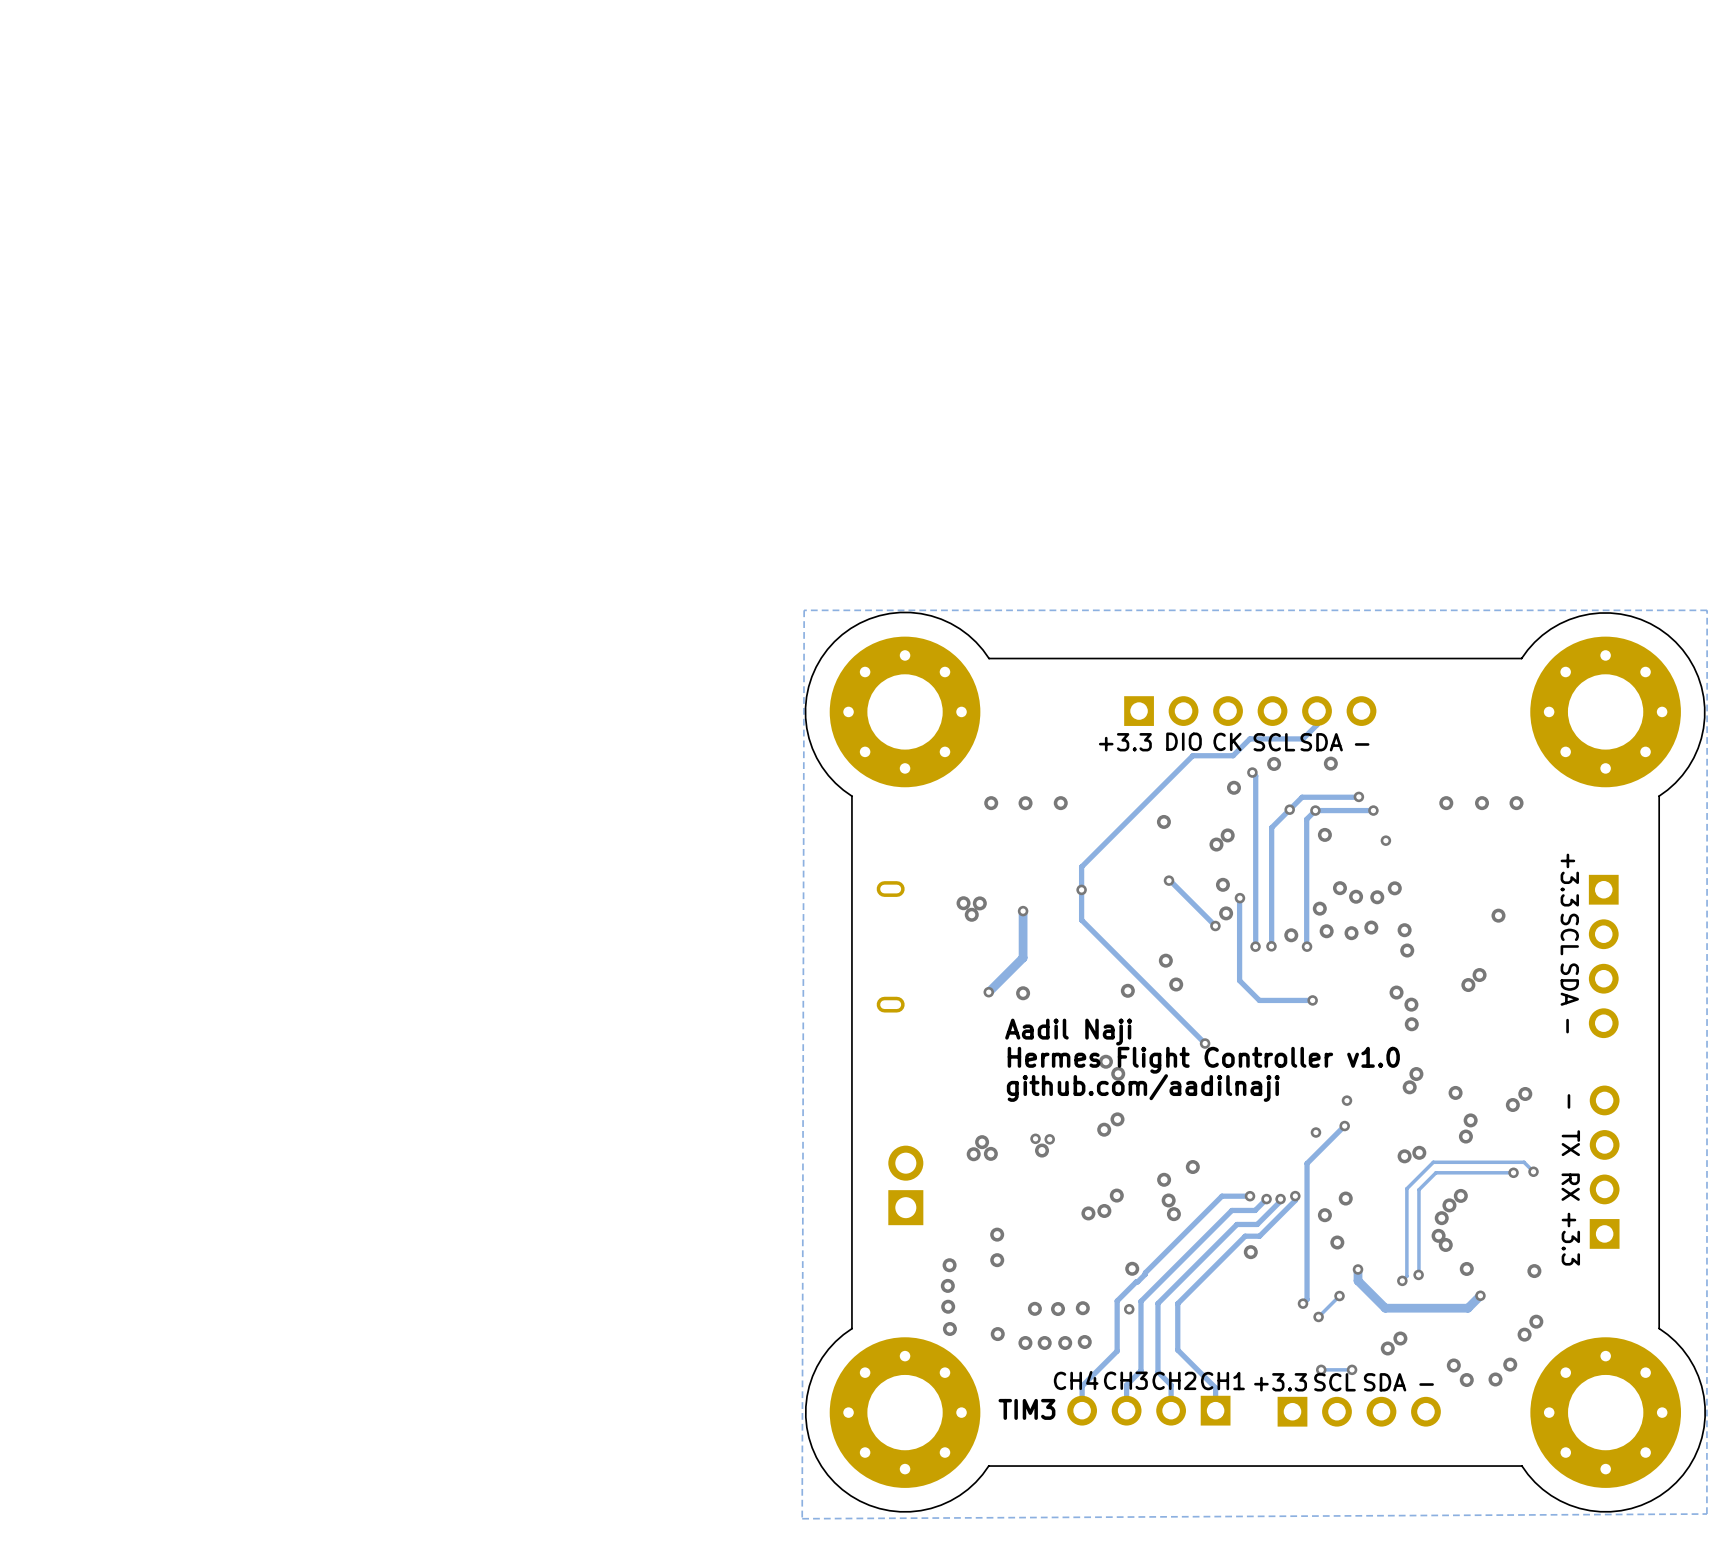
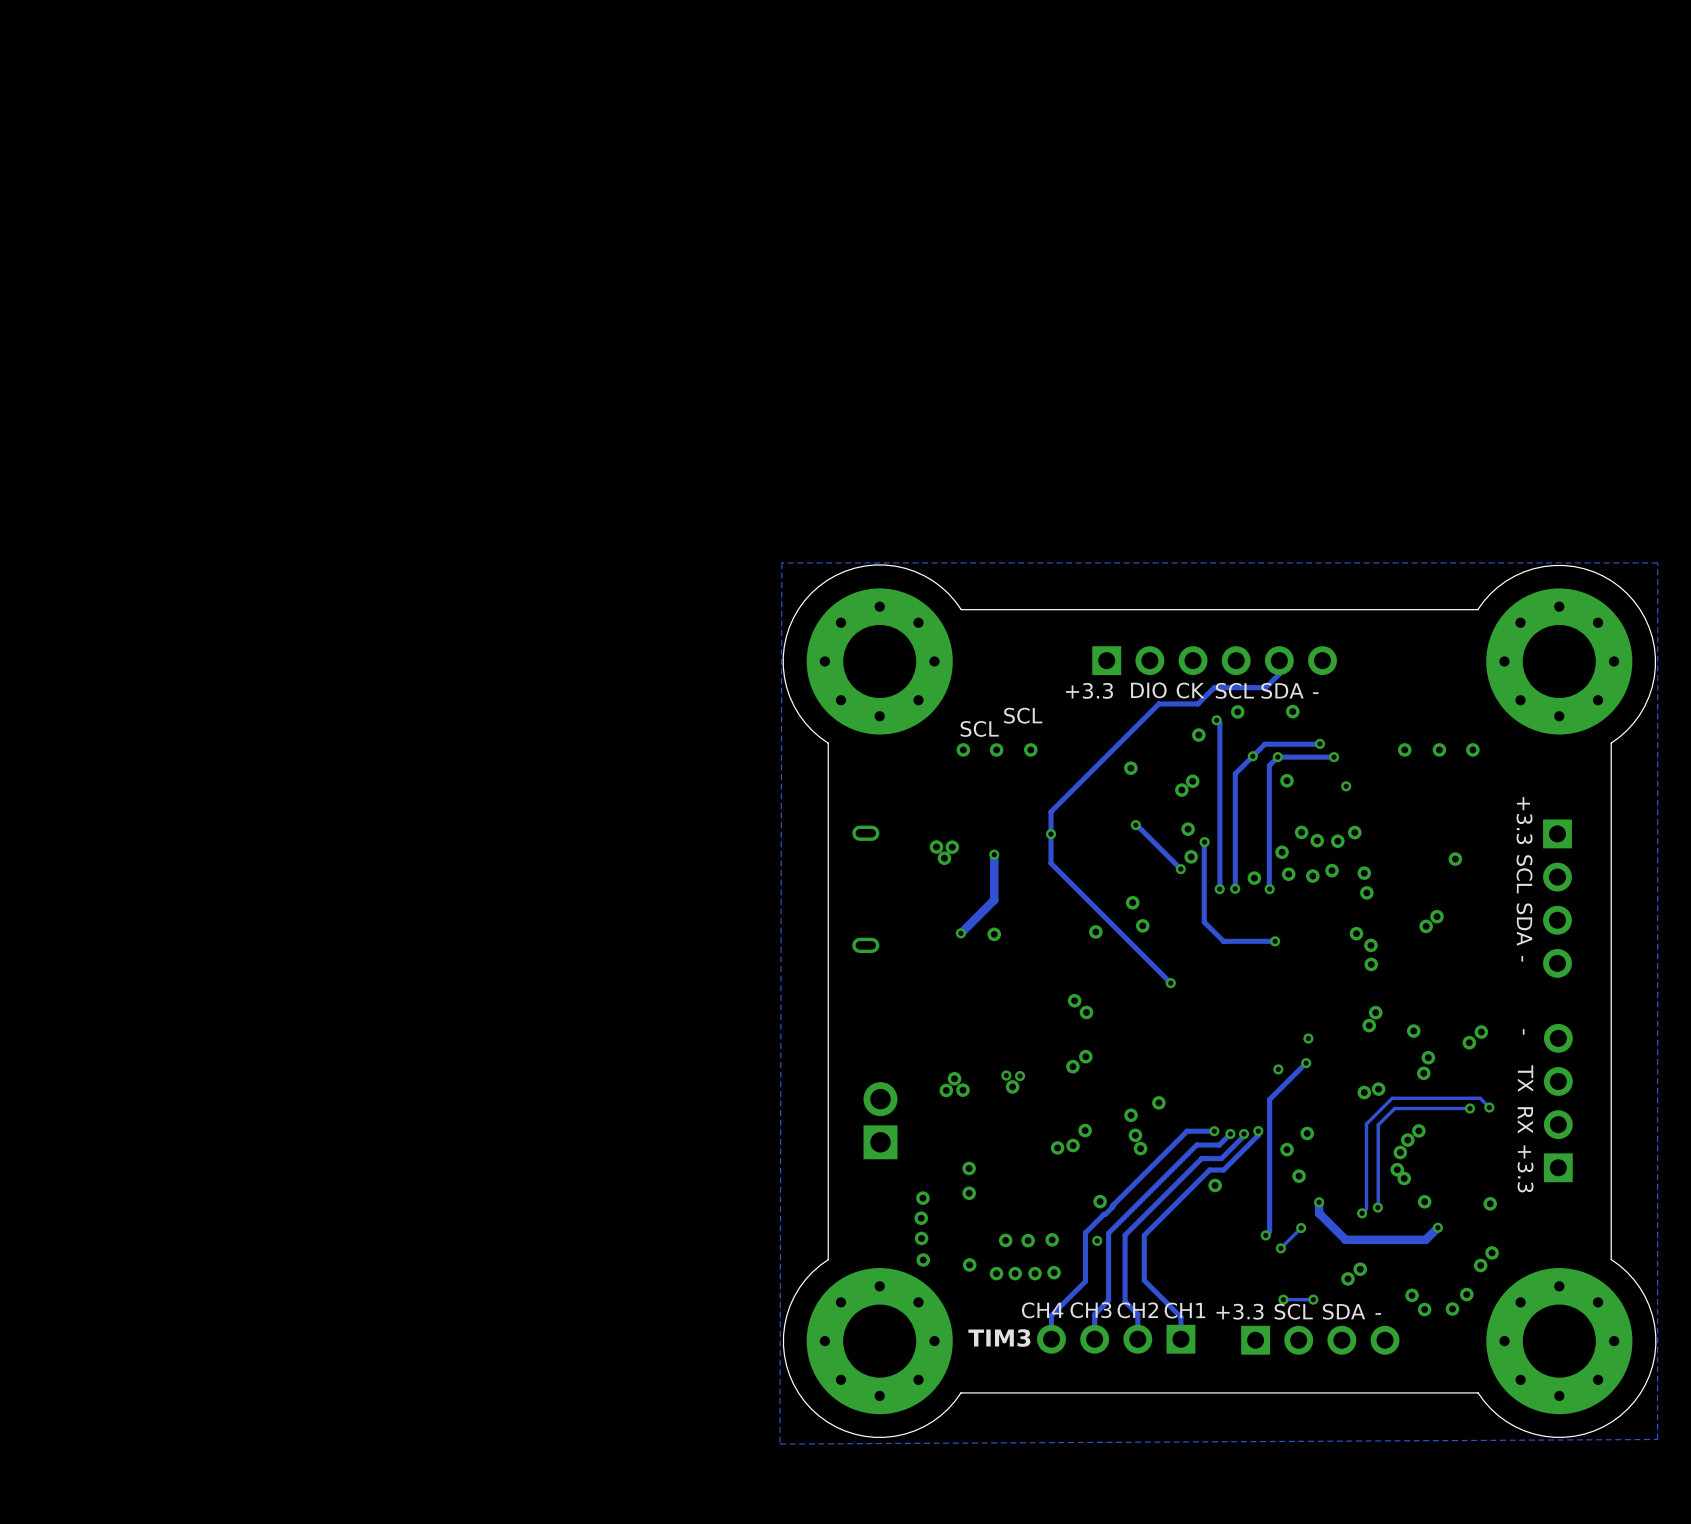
text: none -> SCL (1023, 715)
text: none -> SCL (979, 728)
text: Aadil Naji (1068, 1032) -> none
text: Hermes Flight Controller v1.0 (1203, 1060) -> none
text: github.com/aadilnaji (1143, 1088) -> none

